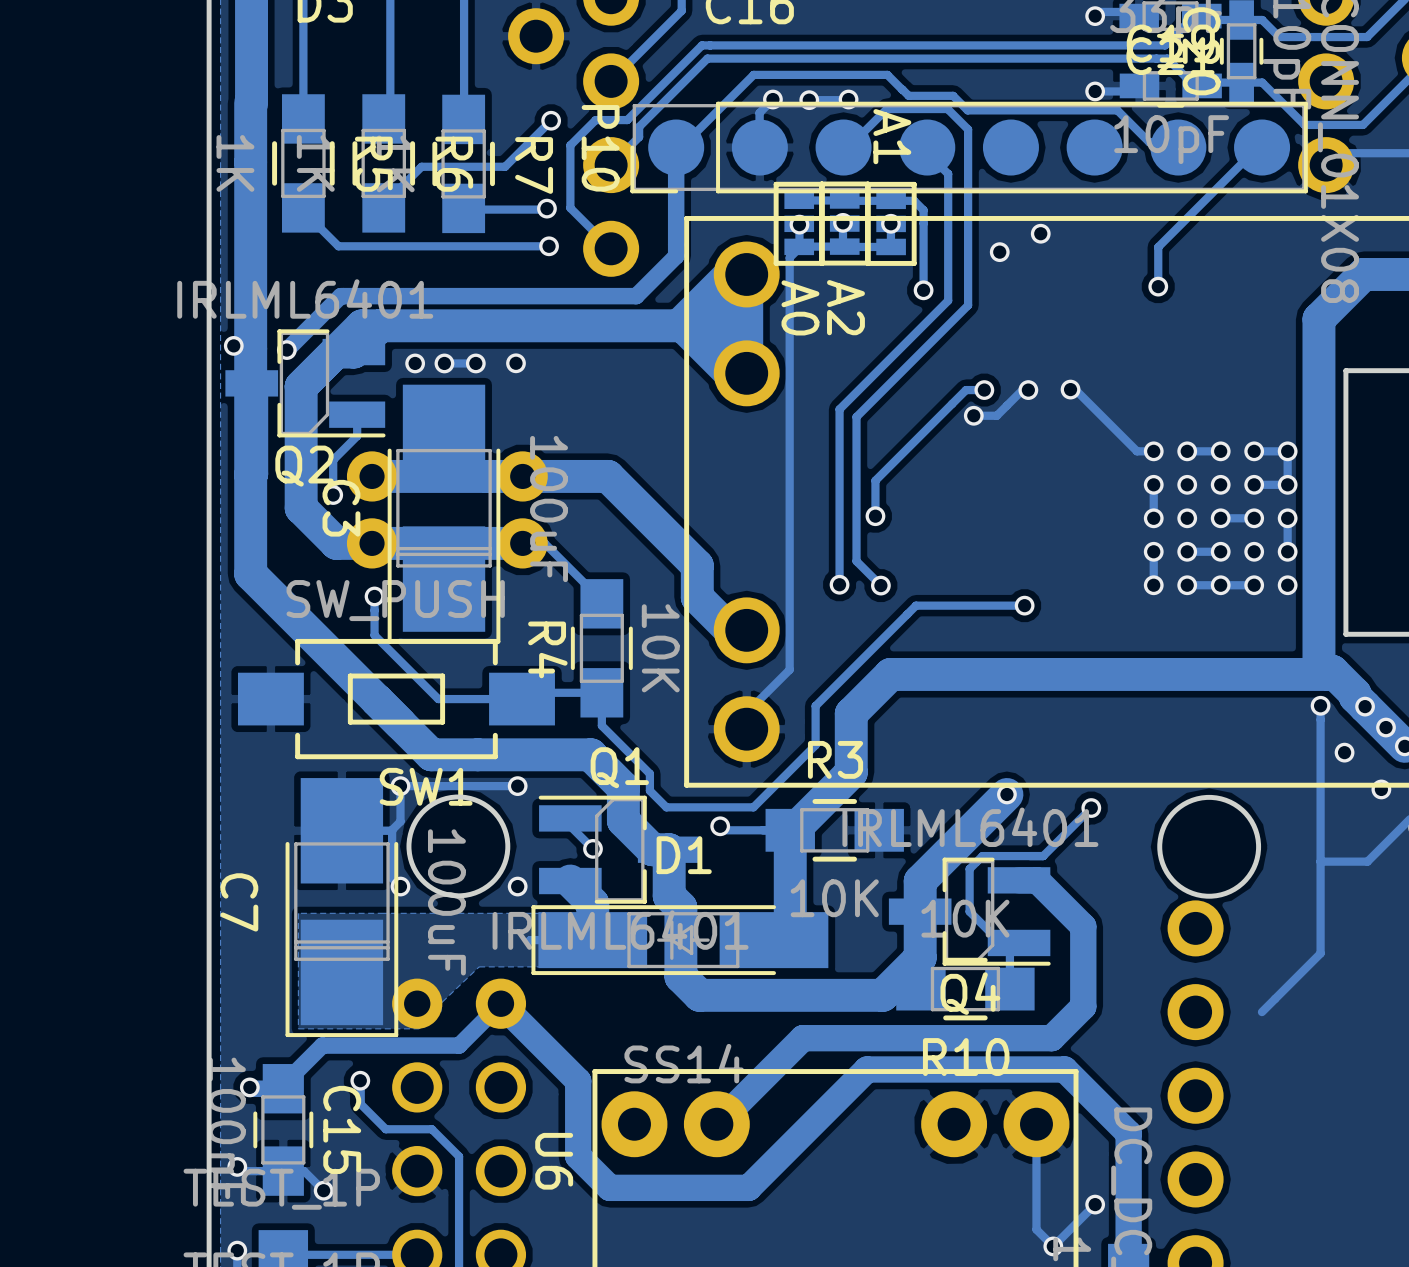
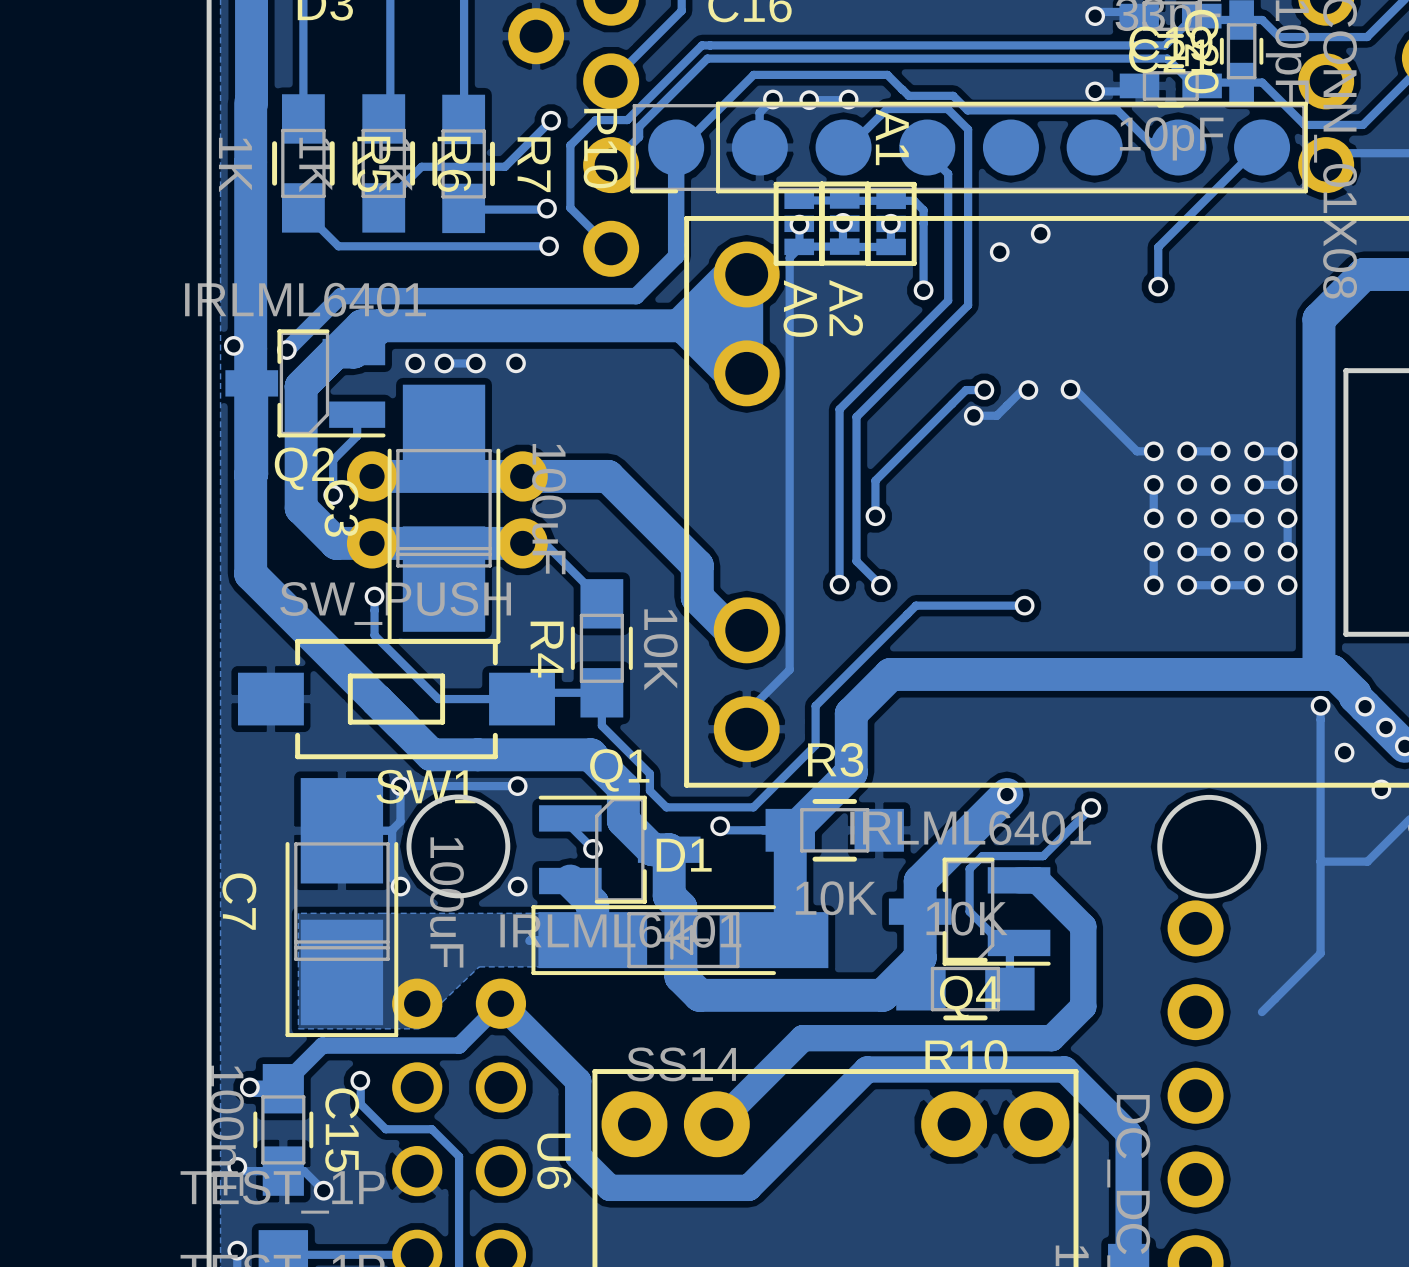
track: (1036, 1124) (1036, 1229) (1053, 1246) (1095, 1204) -> none
via: (1095, 1204) -> none
via: (1053, 1246) -> none

